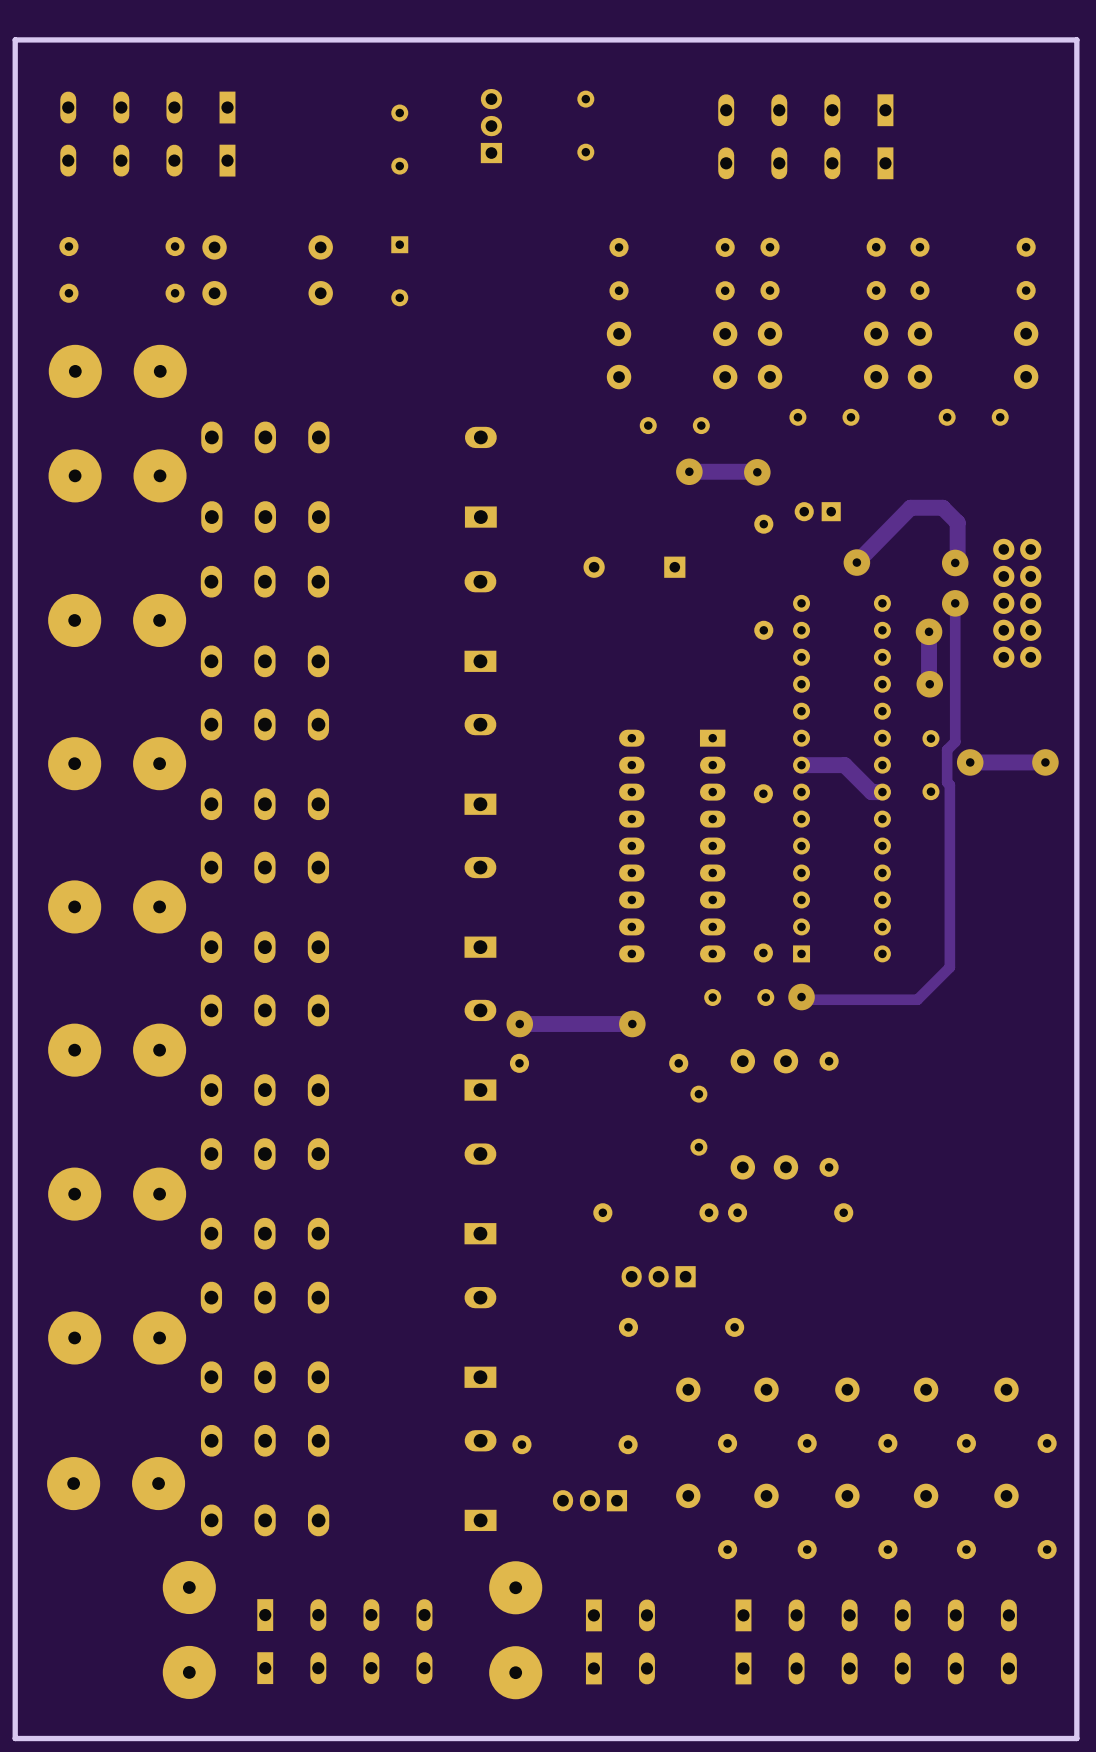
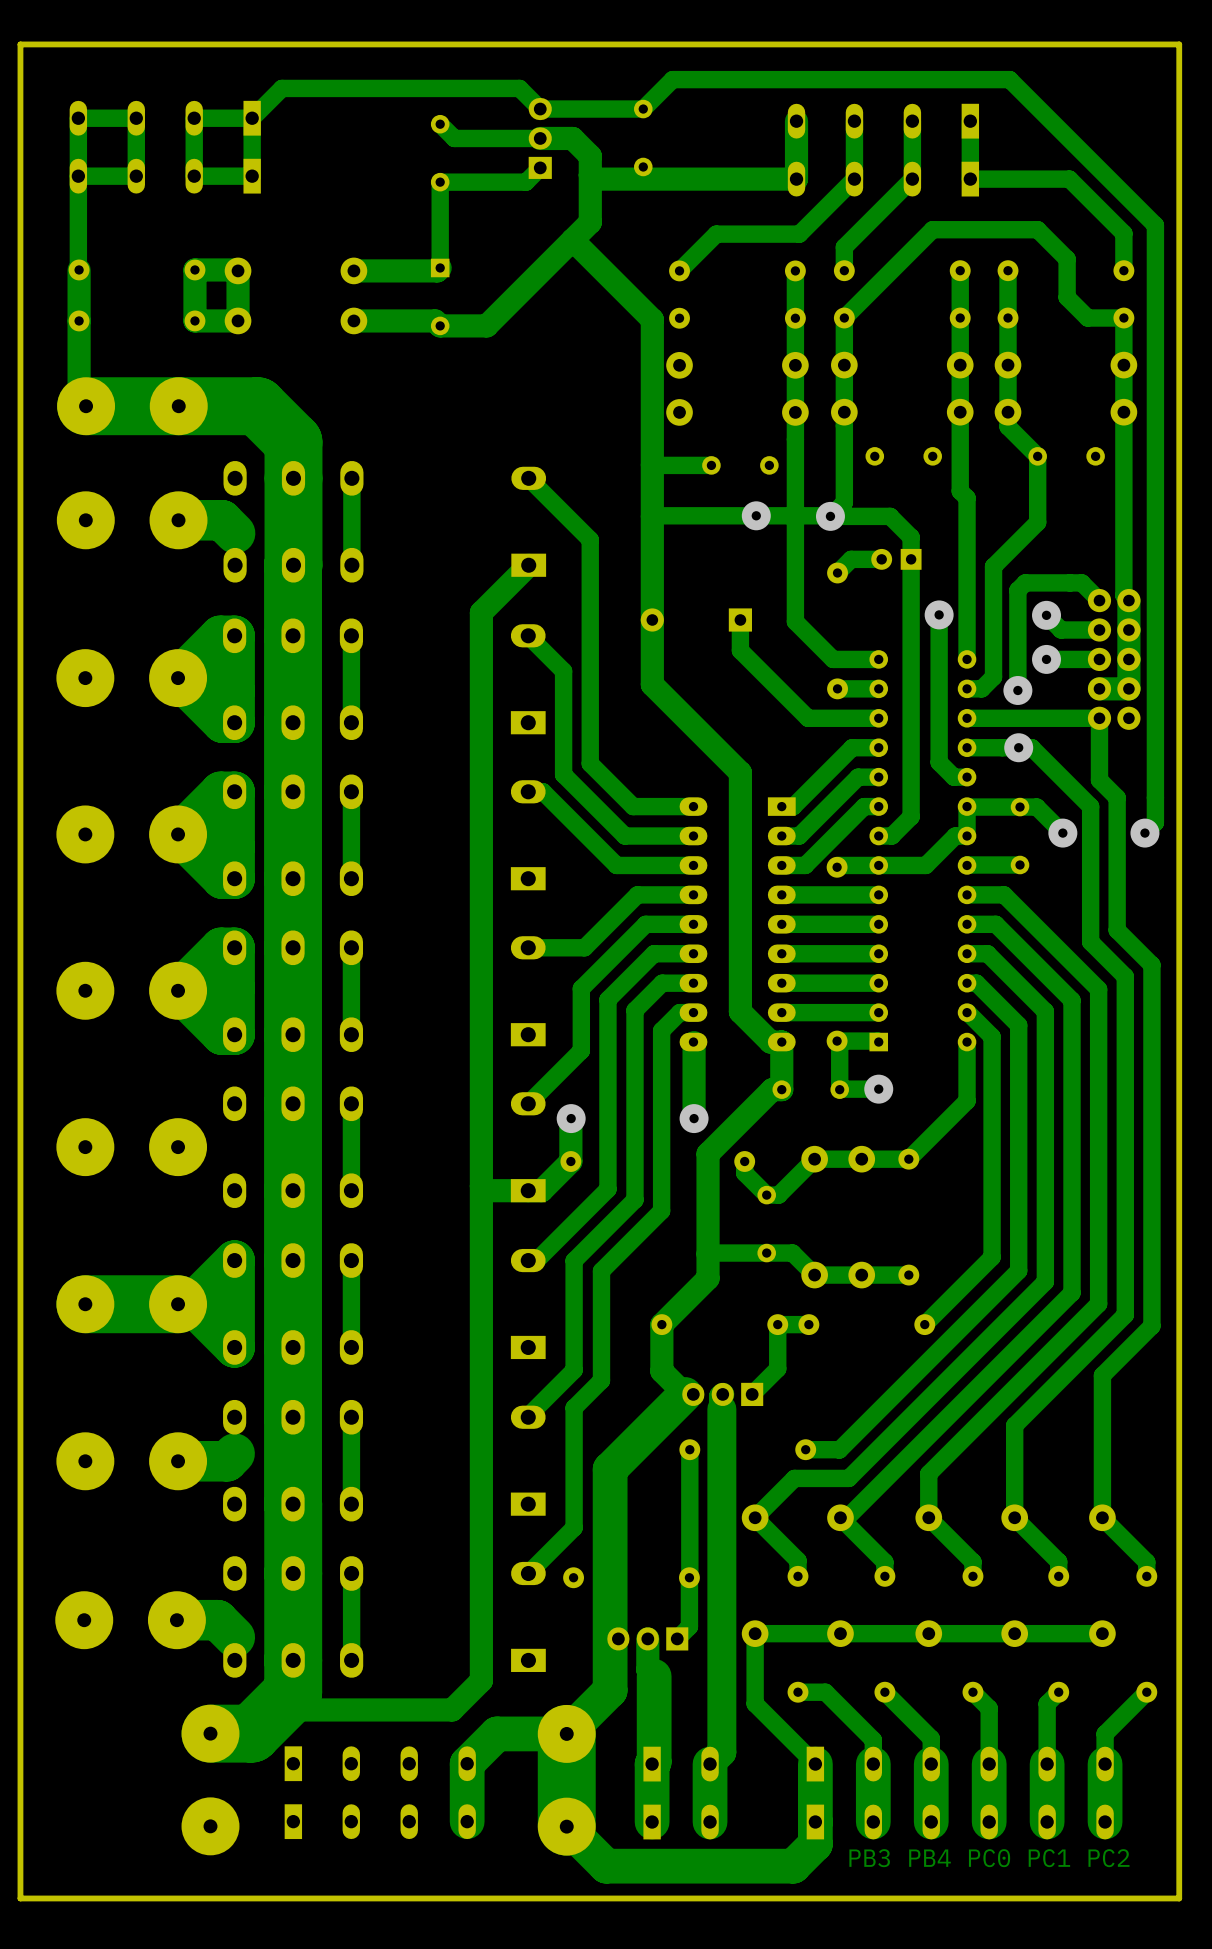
track: none -> (252, 118) (194, 118) (194, 176) (252, 176) (252, 118)
track: none -> (252, 118) (281, 88) (519, 88) (540, 109) (643, 109) (672, 79) (1009, 79) (1155, 225) (1155, 822) (1144, 833)
track: none -> (796, 121) (796, 179) (594, 179) (590, 175)
track: none -> (854, 121) (854, 179) (799, 234) (716, 234) (679, 270)
track: none -> (912, 121) (912, 179) (844, 247) (844, 270)
track: none -> (970, 121) (970, 179) (1069, 179) (1123, 233) (1123, 270)
track: none -> (440, 124) (454, 138) (572, 138) (590, 156) (590, 222) (486, 325) (440, 325) (435, 320) (353, 320)
track: none -> (540, 167) (526, 182) (440, 182) (440, 267) (437, 270) (353, 270)
track: none -> (78, 176) (136, 176) (136, 118) (78, 118) (78, 269) (79, 399) (86, 406) (257, 406) (293, 442) (293, 1691) (251, 1733) (210, 1733)
track: none -> (572, 240) (652, 319) (652, 684) (740, 772) (740, 1011) (770, 1042) (781, 1042) (781, 1089) (772, 1089) (708, 1153) (708, 1278) (661, 1324) (661, 1371) (685, 1394) (610, 1469) (610, 1690) (566, 1733)
track: none -> (237, 269) (194, 269) (194, 320) (238, 320) (237, 269)
track: none -> (795, 270) (795, 621) (833, 659) (878, 659)
track: none -> (960, 270) (960, 491) (967, 498) (967, 659)
track: none -> (1008, 270) (1008, 426) (1037, 456) (1037, 522) (993, 566) (993, 677) (981, 688) (967, 688)
track: none -> (652, 464) (711, 465)
track: none -> (351, 478) (351, 565)
track: none -> (528, 478) (590, 539) (590, 763) (633, 806) (693, 806)
track: none -> (756, 515) (652, 516)
track: none -> (178, 520) (222, 520) (235, 533)
track: none -> (881, 559) (851, 559) (837, 572)
track: none -> (528, 565) (481, 612) (481, 1680) (452, 1709) (275, 1709)
track: (856, 562) (910, 507) (942, 507) (957, 522) (957, 560) (955, 562) -> (1099, 630) (1061, 630) (1046, 615)
track: none -> (939, 614) (939, 762) (953, 777) (967, 777)
track: none -> (740, 619) (740, 650) (808, 718) (878, 718)
track: none -> (351, 635) (351, 722)
track: none -> (528, 635) (563, 671) (563, 774) (624, 836) (693, 836)
track: (955, 603) (955, 741) (947, 749) (947, 782) (949, 785) (949, 967) (917, 999) (804, 999) (801, 997) -> (878, 1042) (837, 1041) (839, 1043) (839, 1089) (878, 1089)
track: none -> (1099, 659) (1046, 659)
track: none -> (178, 678) (222, 722) (234, 722) (234, 635) (220, 635) (178, 678)
track: none -> (878, 688) (837, 688)
track: none -> (1099, 688) (1128, 688) (1128, 600) (1123, 595) (1123, 318) (1087, 318) (1067, 297) (1067, 259) (1037, 229) (932, 229) (844, 318) (844, 502) (830, 516) (890, 516) (911, 537) (911, 816) (891, 836)
track: (929, 631) (929, 684) -> (1017, 690) (1017, 590) (1025, 582) (1081, 582) (1099, 600)
track: none -> (967, 718) (1099, 718) (1099, 780) (1117, 797) (1117, 930) (1151, 965) (1151, 1326) (1102, 1375) (1102, 1517) (1146, 1562) (1146, 1576)
track: none -> (878, 747) (852, 747) (793, 806) (781, 806)
track: none -> (967, 747) (1031, 747) (1090, 806) (1090, 941) (1125, 976) (1125, 1314) (1014, 1425) (1014, 1517) (1058, 1561) (1058, 1576)
track: none -> (878, 777) (858, 777) (799, 836) (781, 836)
track: none -> (351, 791) (351, 878)
track: none -> (528, 791) (543, 791) (616, 865) (693, 865)
track: none -> (878, 806) (864, 806) (805, 865) (781, 865)
track: (1045, 762) (970, 762) -> (837, 867) (838, 865) (925, 865) (955, 836) (967, 836) (967, 806) (1036, 807) (1062, 833)
track: none -> (178, 834) (220, 791) (234, 791) (234, 878) (222, 878) (178, 834)
track: (813, 765) (844, 765) (871, 792) (882, 792) -> (1020, 865) (967, 865)
track: none -> (693, 894) (637, 894) (584, 947) (528, 947)
track: none -> (878, 894) (781, 894)
track: none -> (967, 894) (1004, 894) (1098, 989) (1098, 1303) (928, 1473) (928, 1517) (972, 1561) (972, 1576)
track: none -> (693, 924) (645, 924) (581, 988) (581, 1050) (528, 1103)
track: none -> (878, 924) (781, 924)
track: none -> (967, 924) (995, 924) (1071, 1000) (1071, 1292) (847, 1517) (840, 1517) (884, 1562) (884, 1576)
track: none -> (351, 947) (351, 1034)
track: none -> (693, 953) (653, 953) (607, 999) (607, 1189) (536, 1260) (528, 1260)
track: none -> (878, 953) (781, 953)
track: none -> (967, 953) (987, 953) (1045, 1011) (1045, 1281) (848, 1478) (794, 1478) (755, 1517) (798, 1560) (798, 1576)
track: none -> (693, 983) (662, 983) (634, 1010) (634, 1199) (574, 1260) (574, 1370) (528, 1417)
track: none -> (878, 983) (781, 983)
track: none -> (967, 983) (976, 983) (1018, 1025) (1018, 1270) (839, 1450) (805, 1449)
track: none -> (178, 990) (221, 947) (234, 947) (234, 1034) (221, 1034) (178, 990)
track: none -> (693, 1012) (679, 1012) (661, 1030) (661, 1210) (601, 1271) (601, 1380) (574, 1407) (574, 1527) (528, 1573)
track: none -> (878, 1012) (781, 1012)
track: none -> (967, 1012) (992, 1036) (992, 1257) (924, 1324)
track: none -> (967, 1042) (967, 1100) (908, 1159) (814, 1159) (778, 1195) (766, 1195) (744, 1173) (744, 1161)
track: none -> (351, 1103) (351, 1190)
track: none -> (571, 1118) (570, 1161) (541, 1190) (485, 1190) (481, 1186)
track: (632, 1024) (519, 1024) -> (694, 1118) (693, 1042)
track: none -> (708, 1253) (792, 1253) (814, 1275) (908, 1275)
track: none -> (351, 1260) (351, 1347)
track: none -> (190, 1304) (234, 1260) (234, 1347) (191, 1304) (178, 1304) (85, 1304)
track: none -> (808, 1324) (777, 1324) (777, 1368) (752, 1394)
track: none -> (722, 1394) (720, 1396) (721, 1752) (710, 1764) (710, 1822)
track: none -> (351, 1417) (351, 1504)
track: none -> (689, 1449) (689, 1626) (677, 1638)
track: none -> (234, 1453) (227, 1461) (178, 1461)
track: none -> (351, 1573) (351, 1660)
track: none -> (176, 1620) (217, 1620) (234, 1637)
track: none -> (1102, 1633) (755, 1633) (755, 1703) (815, 1764) (815, 1844) (793, 1866) (606, 1866) (566, 1826) (566, 1733)
track: none -> (647, 1638) (647, 1669) (654, 1676) (652, 1822)
track: none -> (798, 1692) (825, 1692) (873, 1740) (873, 1822)
track: none -> (884, 1692) (931, 1738) (931, 1822)
track: none -> (972, 1692) (989, 1708) (989, 1822)
track: none -> (1058, 1692) (1047, 1703) (1047, 1822)
track: none -> (1146, 1692) (1105, 1733) (1105, 1822)
track: none -> (566, 1733) (496, 1733) (467, 1763) (467, 1821)
text: none -> PB3 PB4 PC0 PC1 PC2 (989, 1858)

